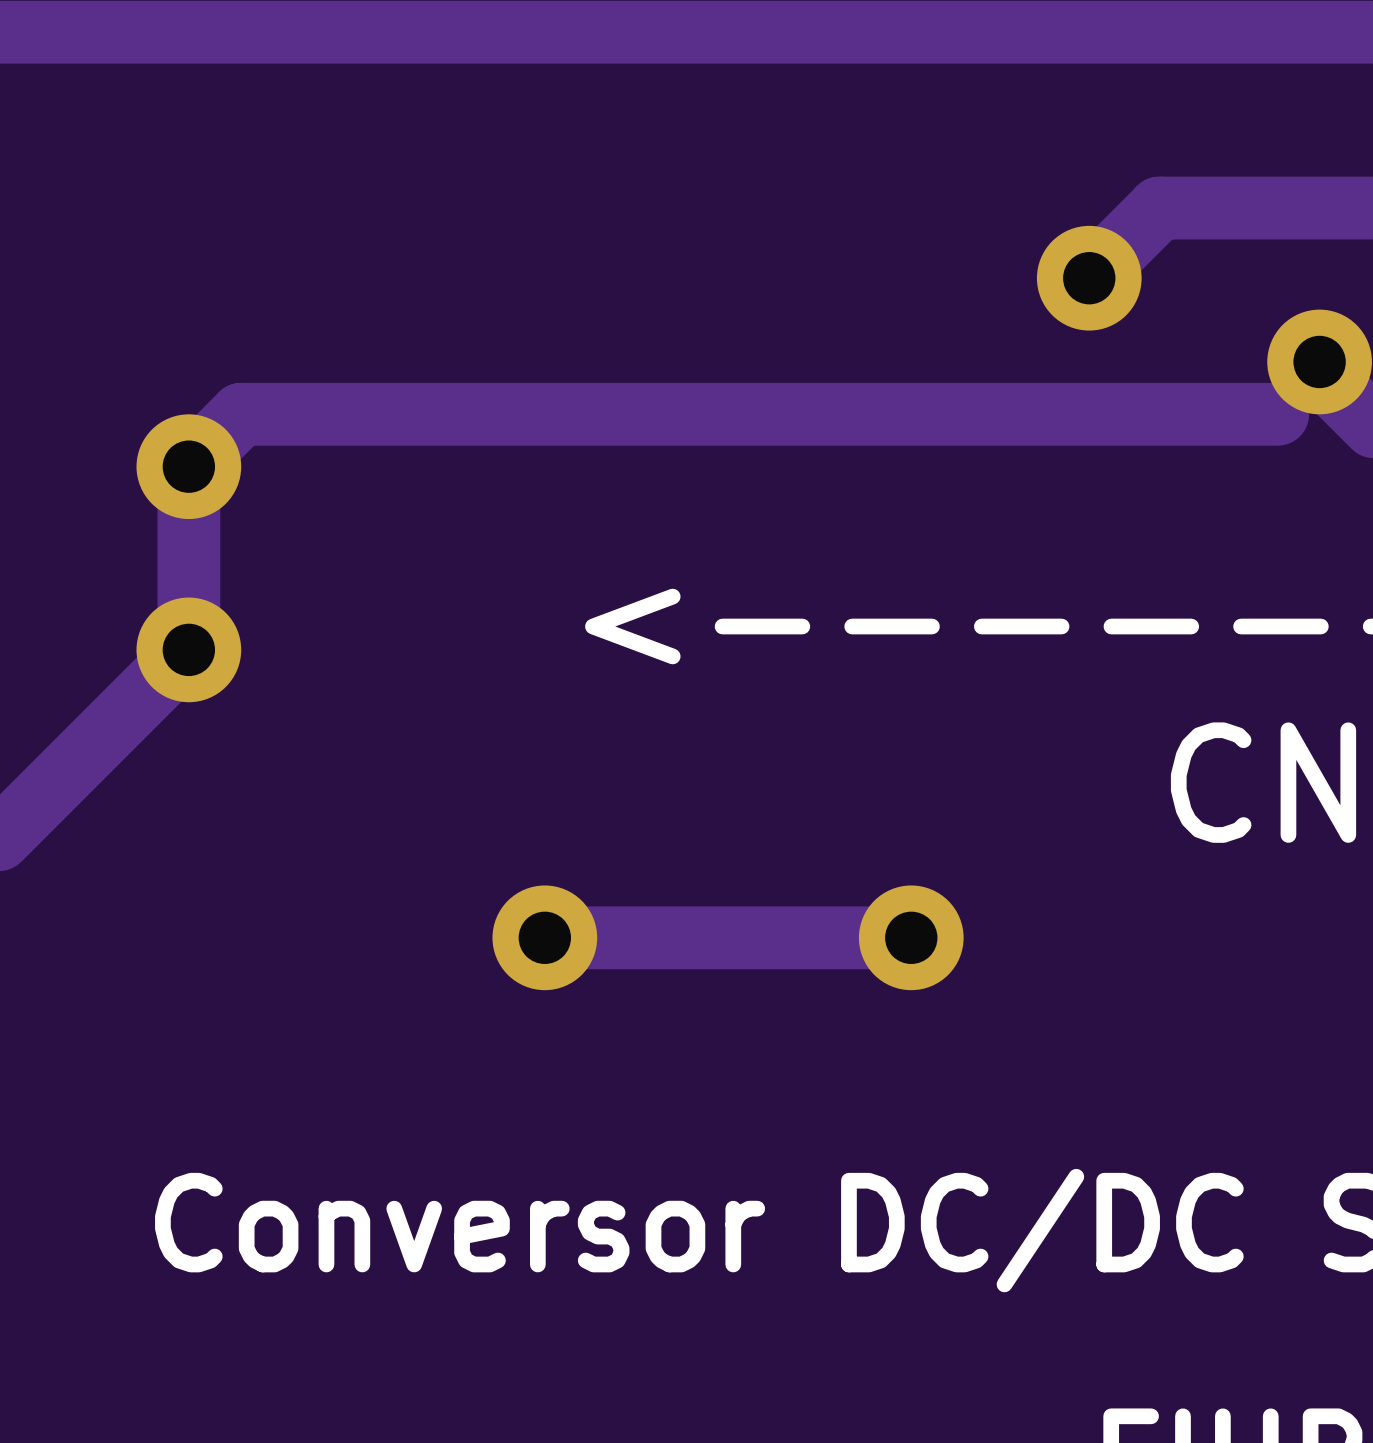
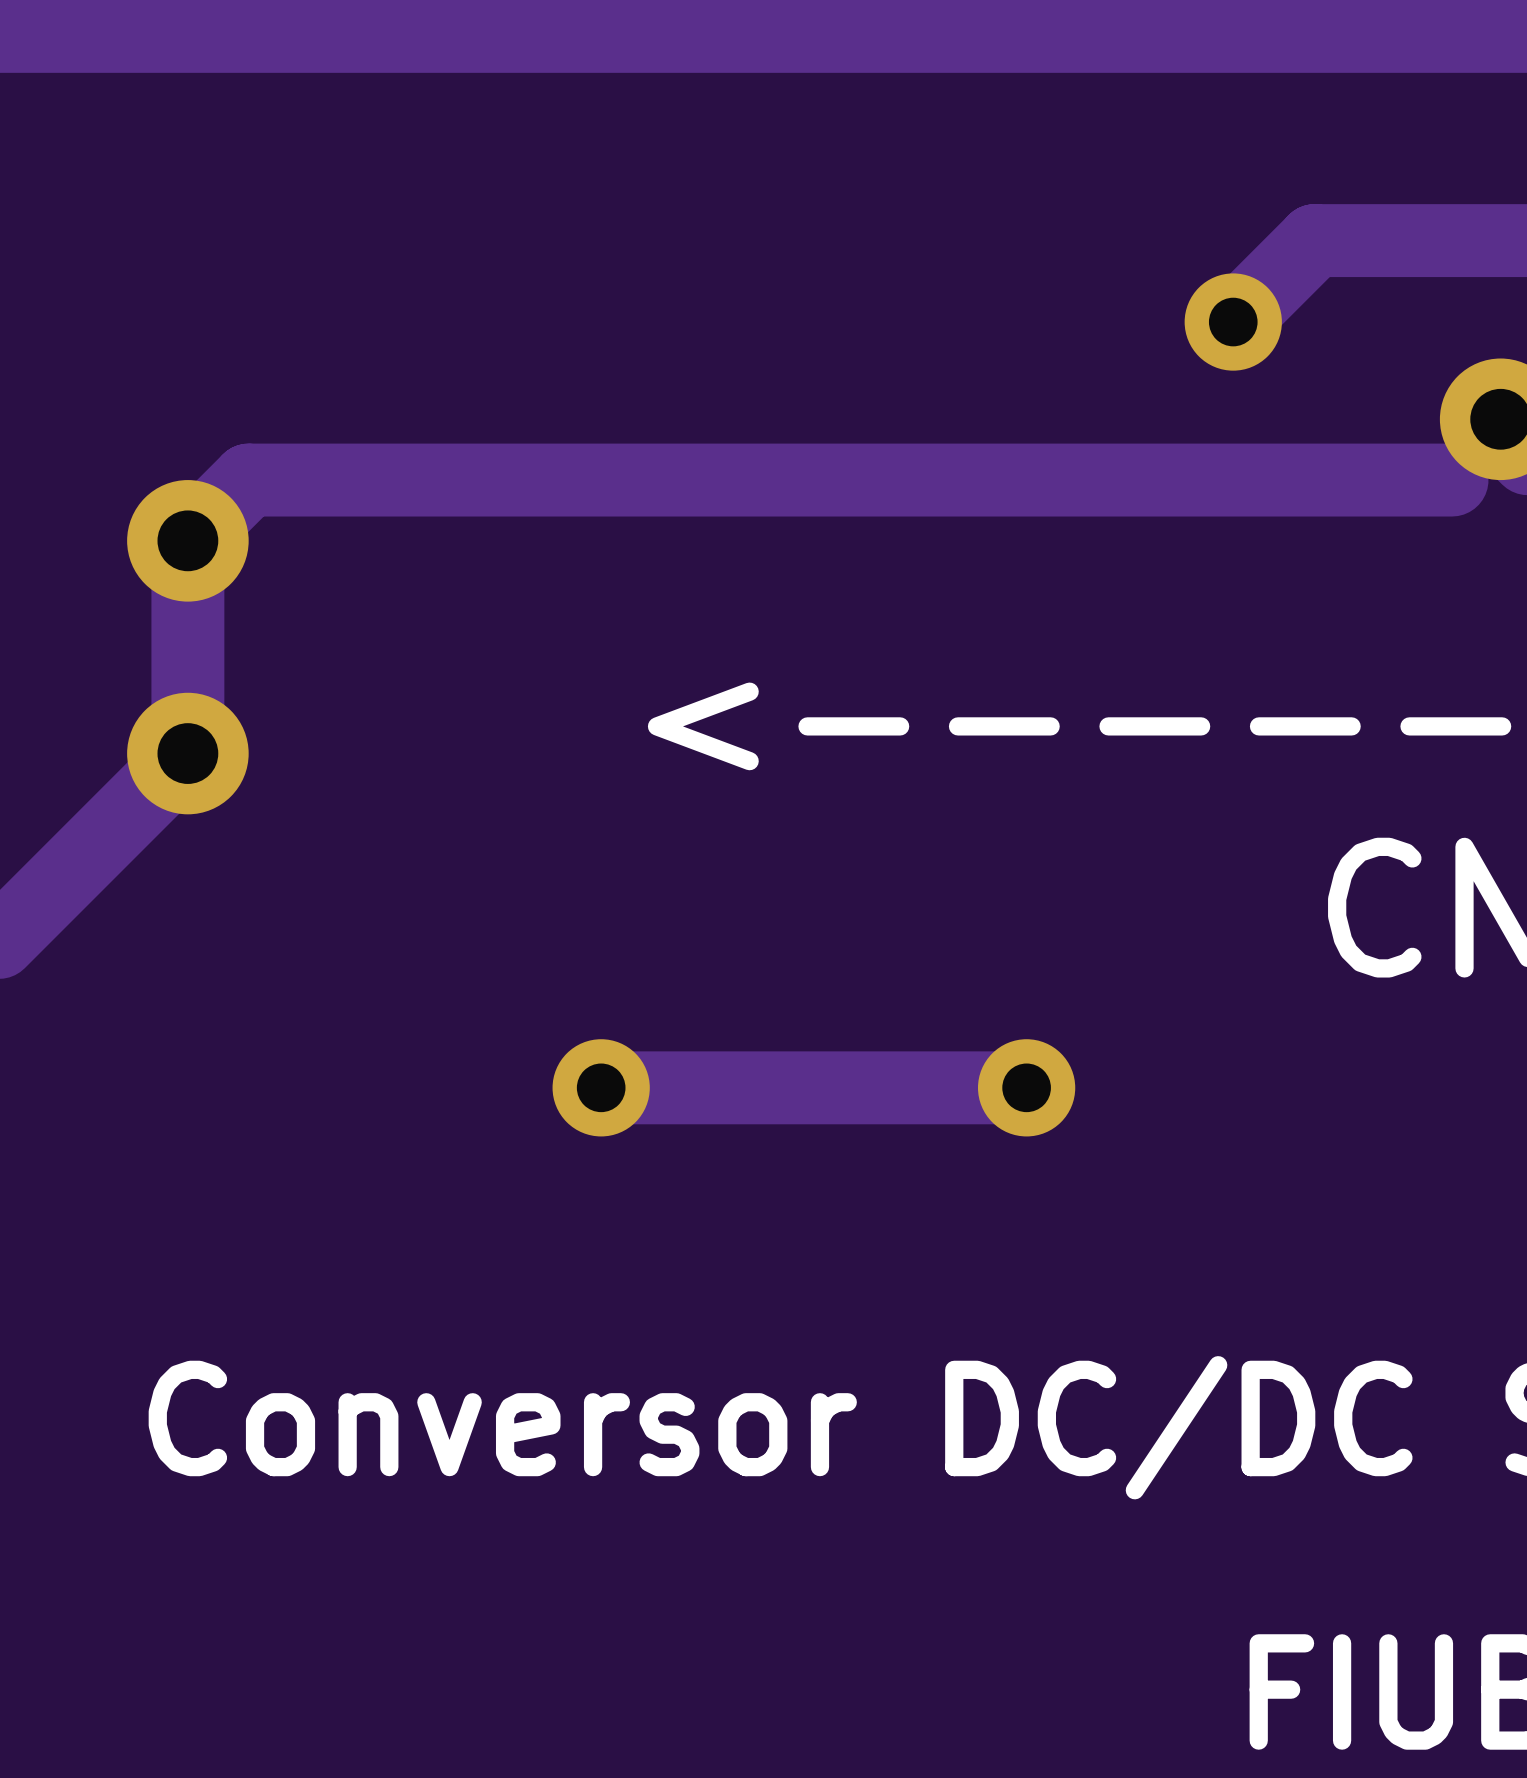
via size: [1036, 225, 1142, 331] -> [1184, 273, 1282, 371]
via size: [492, 885, 598, 991] -> [552, 1039, 650, 1137]
via size: [858, 885, 964, 991] -> [977, 1039, 1076, 1137]

